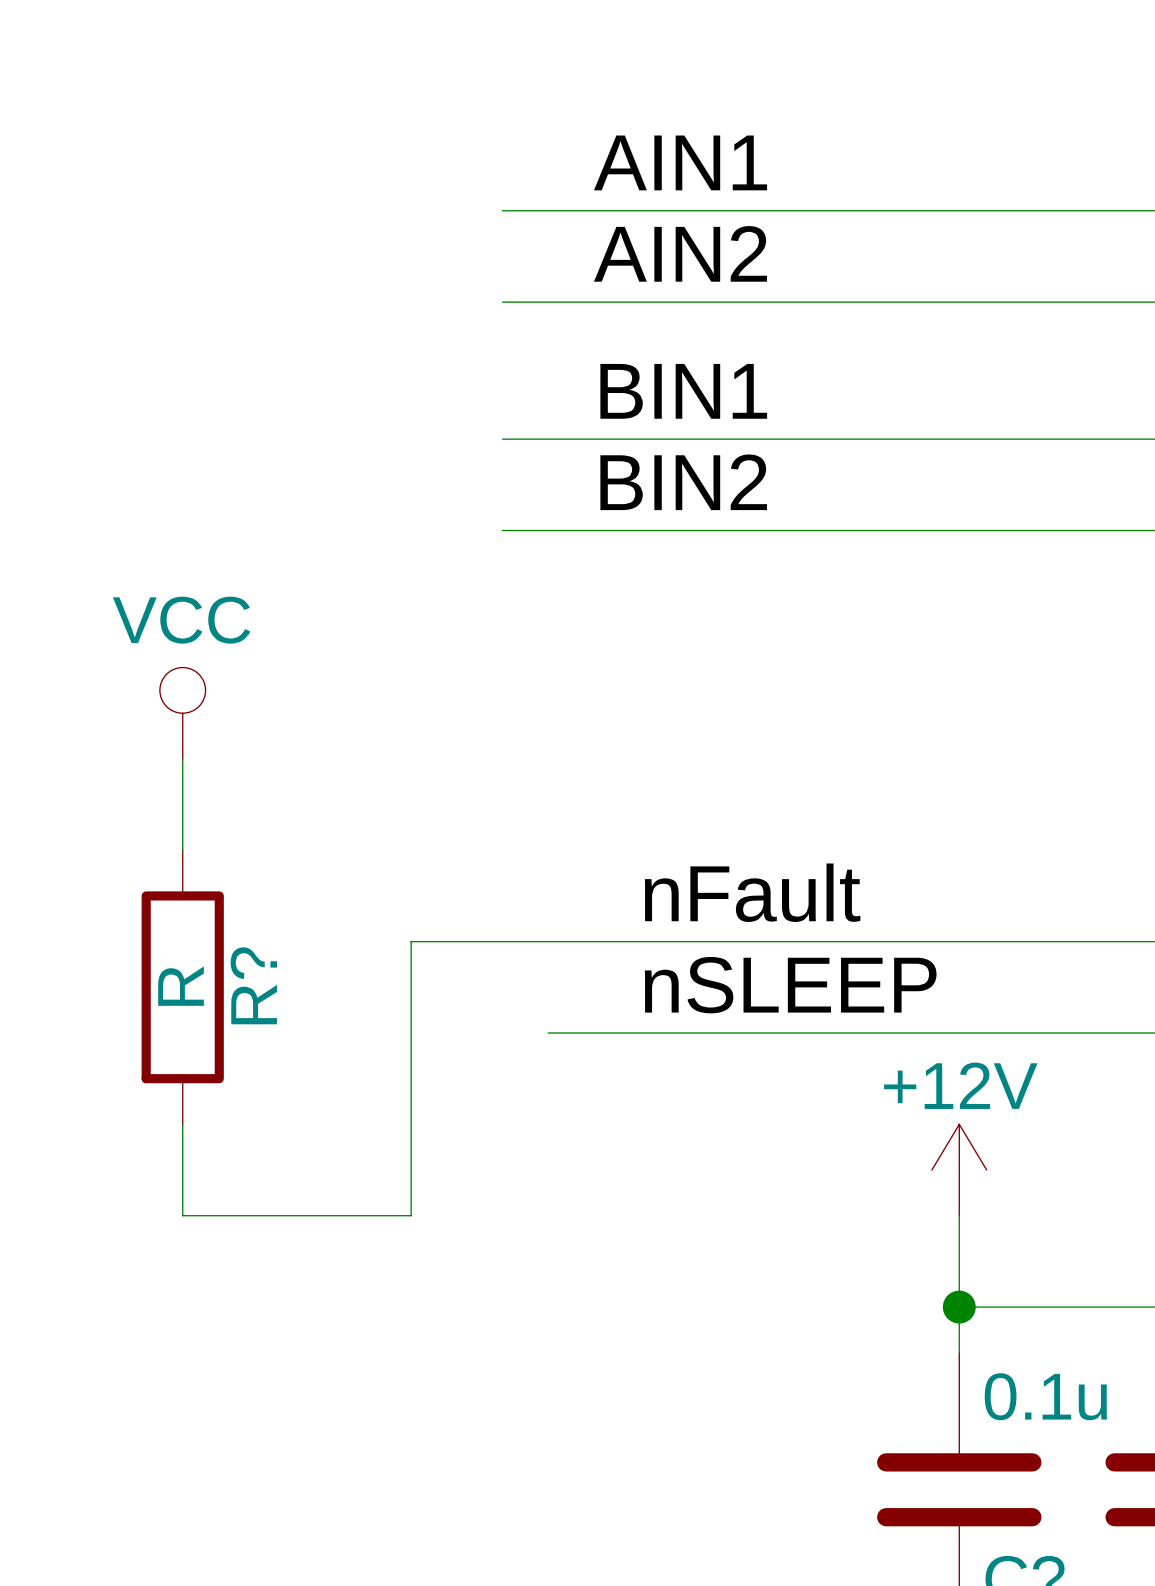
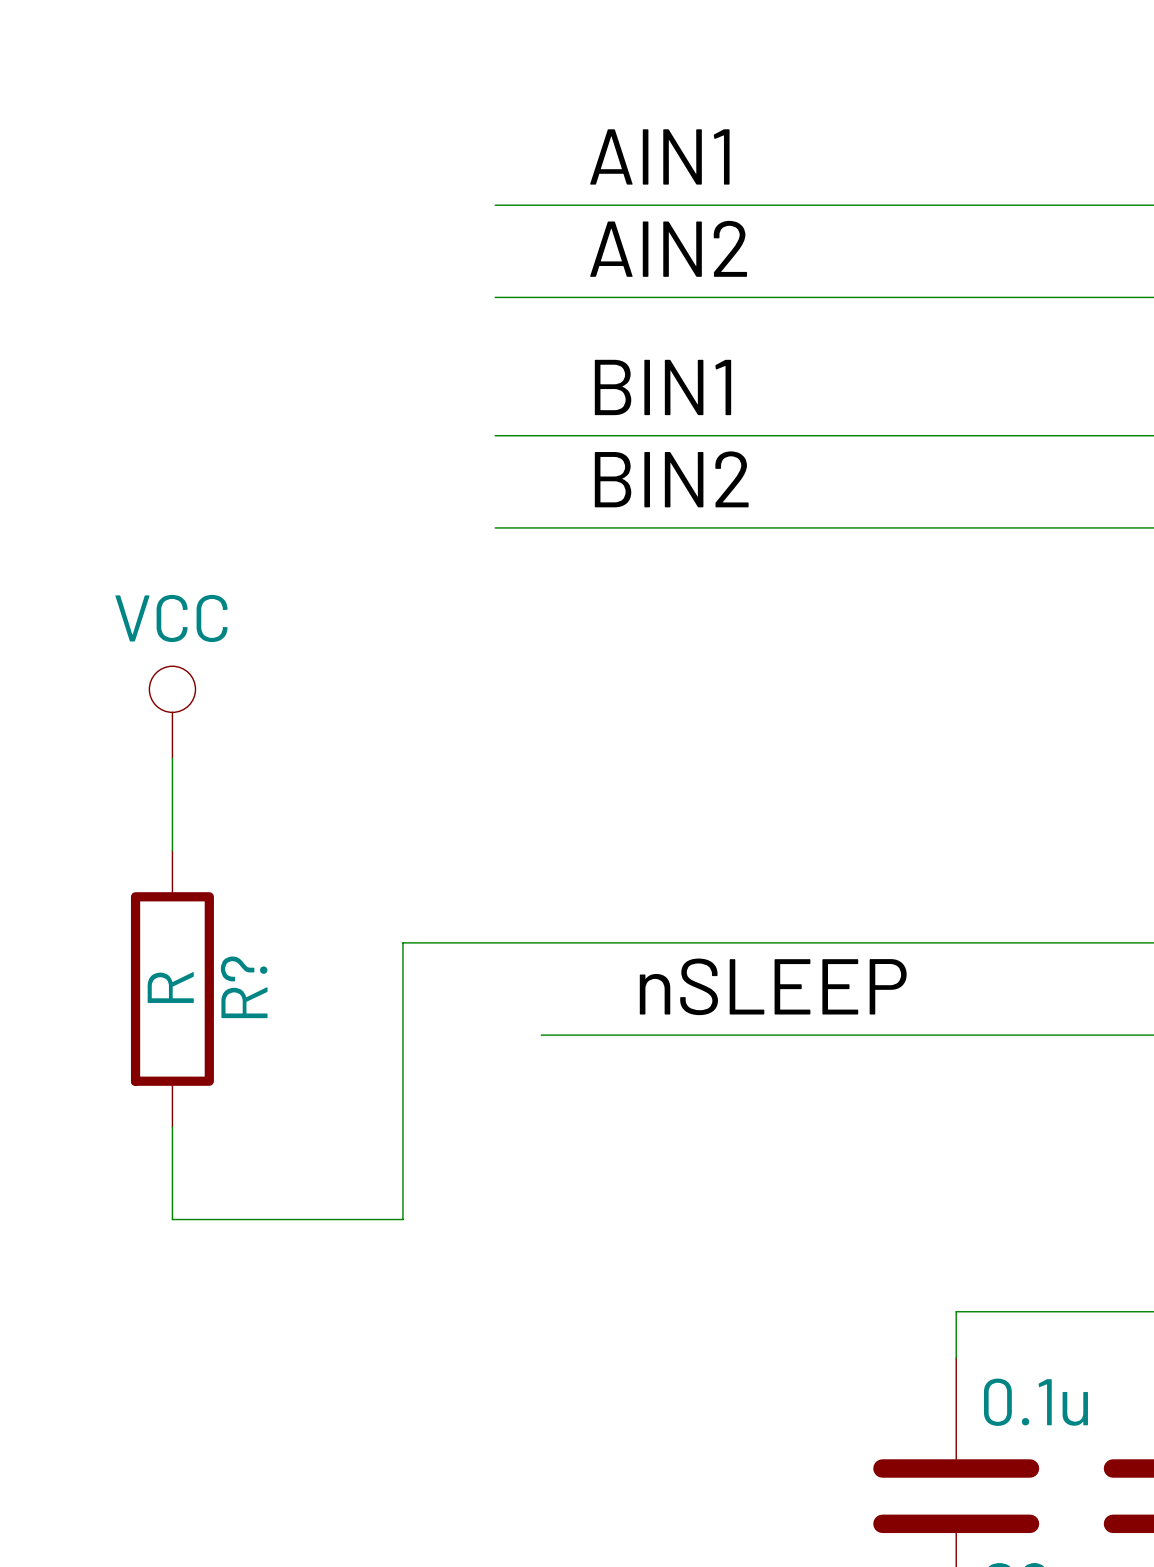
label: nFault (752, 892) -> none
power symbol: +12V (959, 1170) -> none
wire: (959, 1215) (959, 1307) -> none
junction: (959, 1307) -> none

